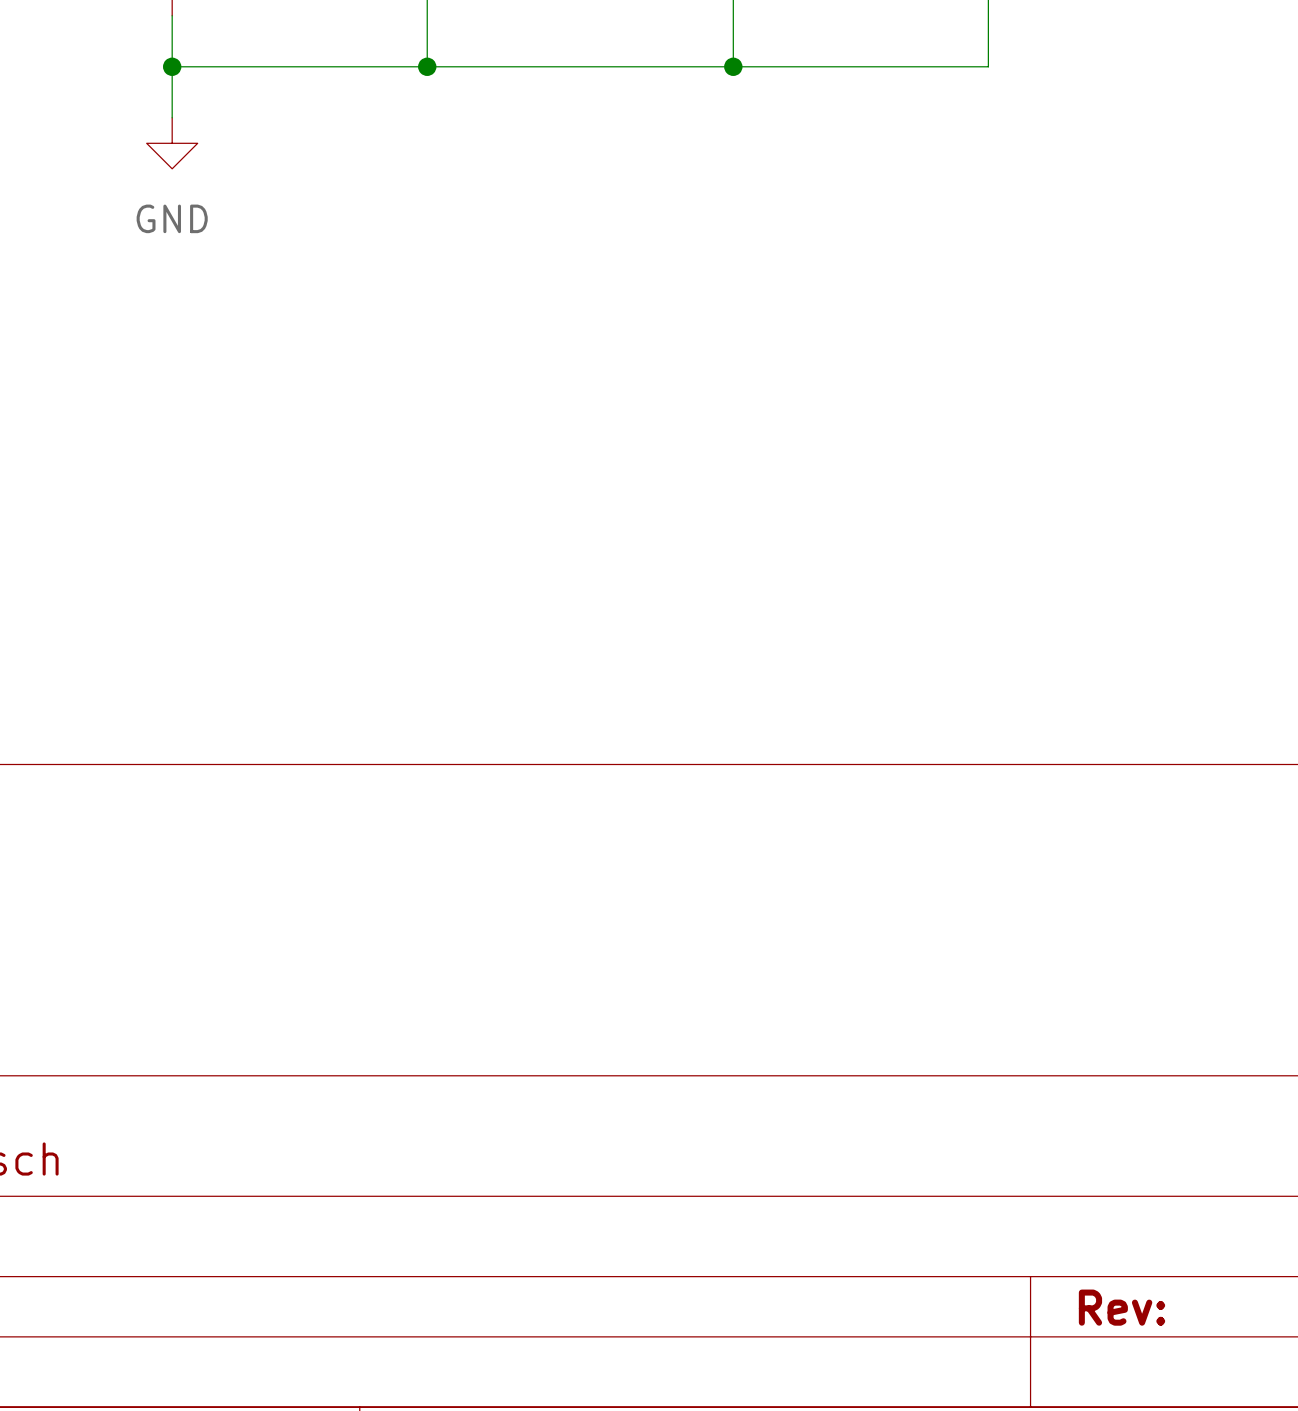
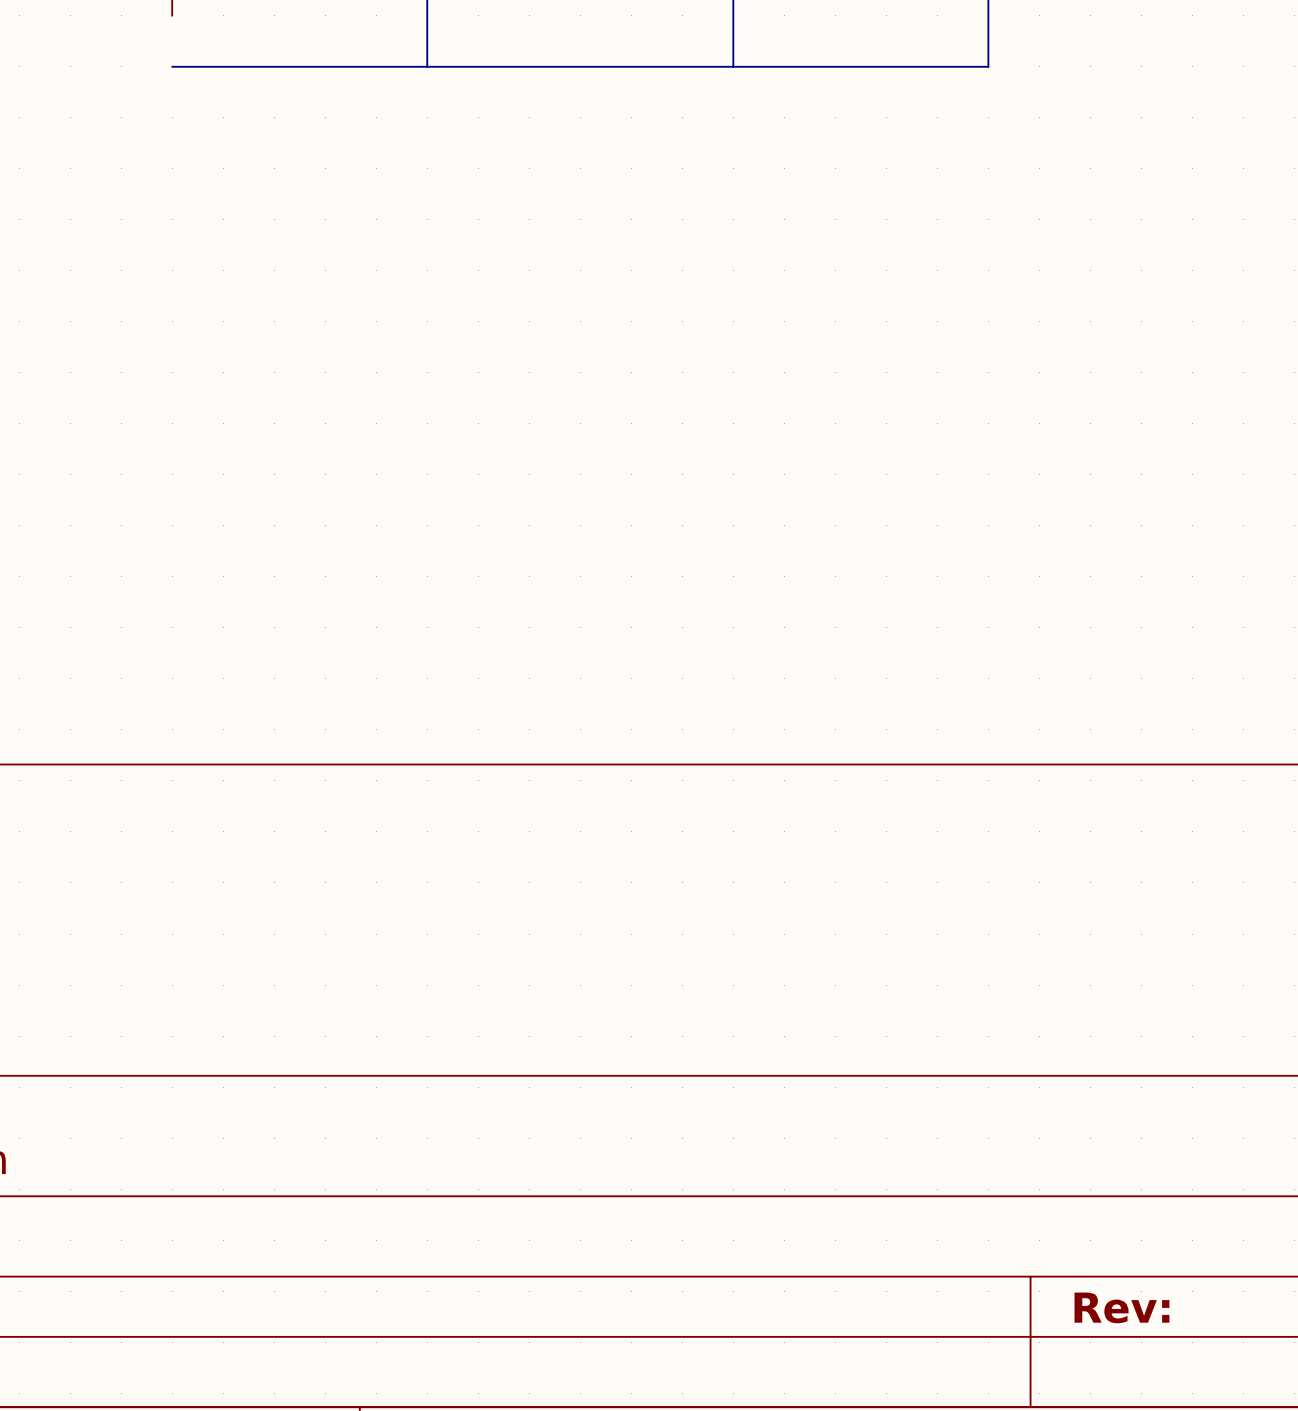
wire: (172, 15) (172, 117) -> none
junction: (172, 66) -> none
junction: (427, 66) -> none
junction: (733, 66) -> none
power symbol: GND (172, 143) -> none

